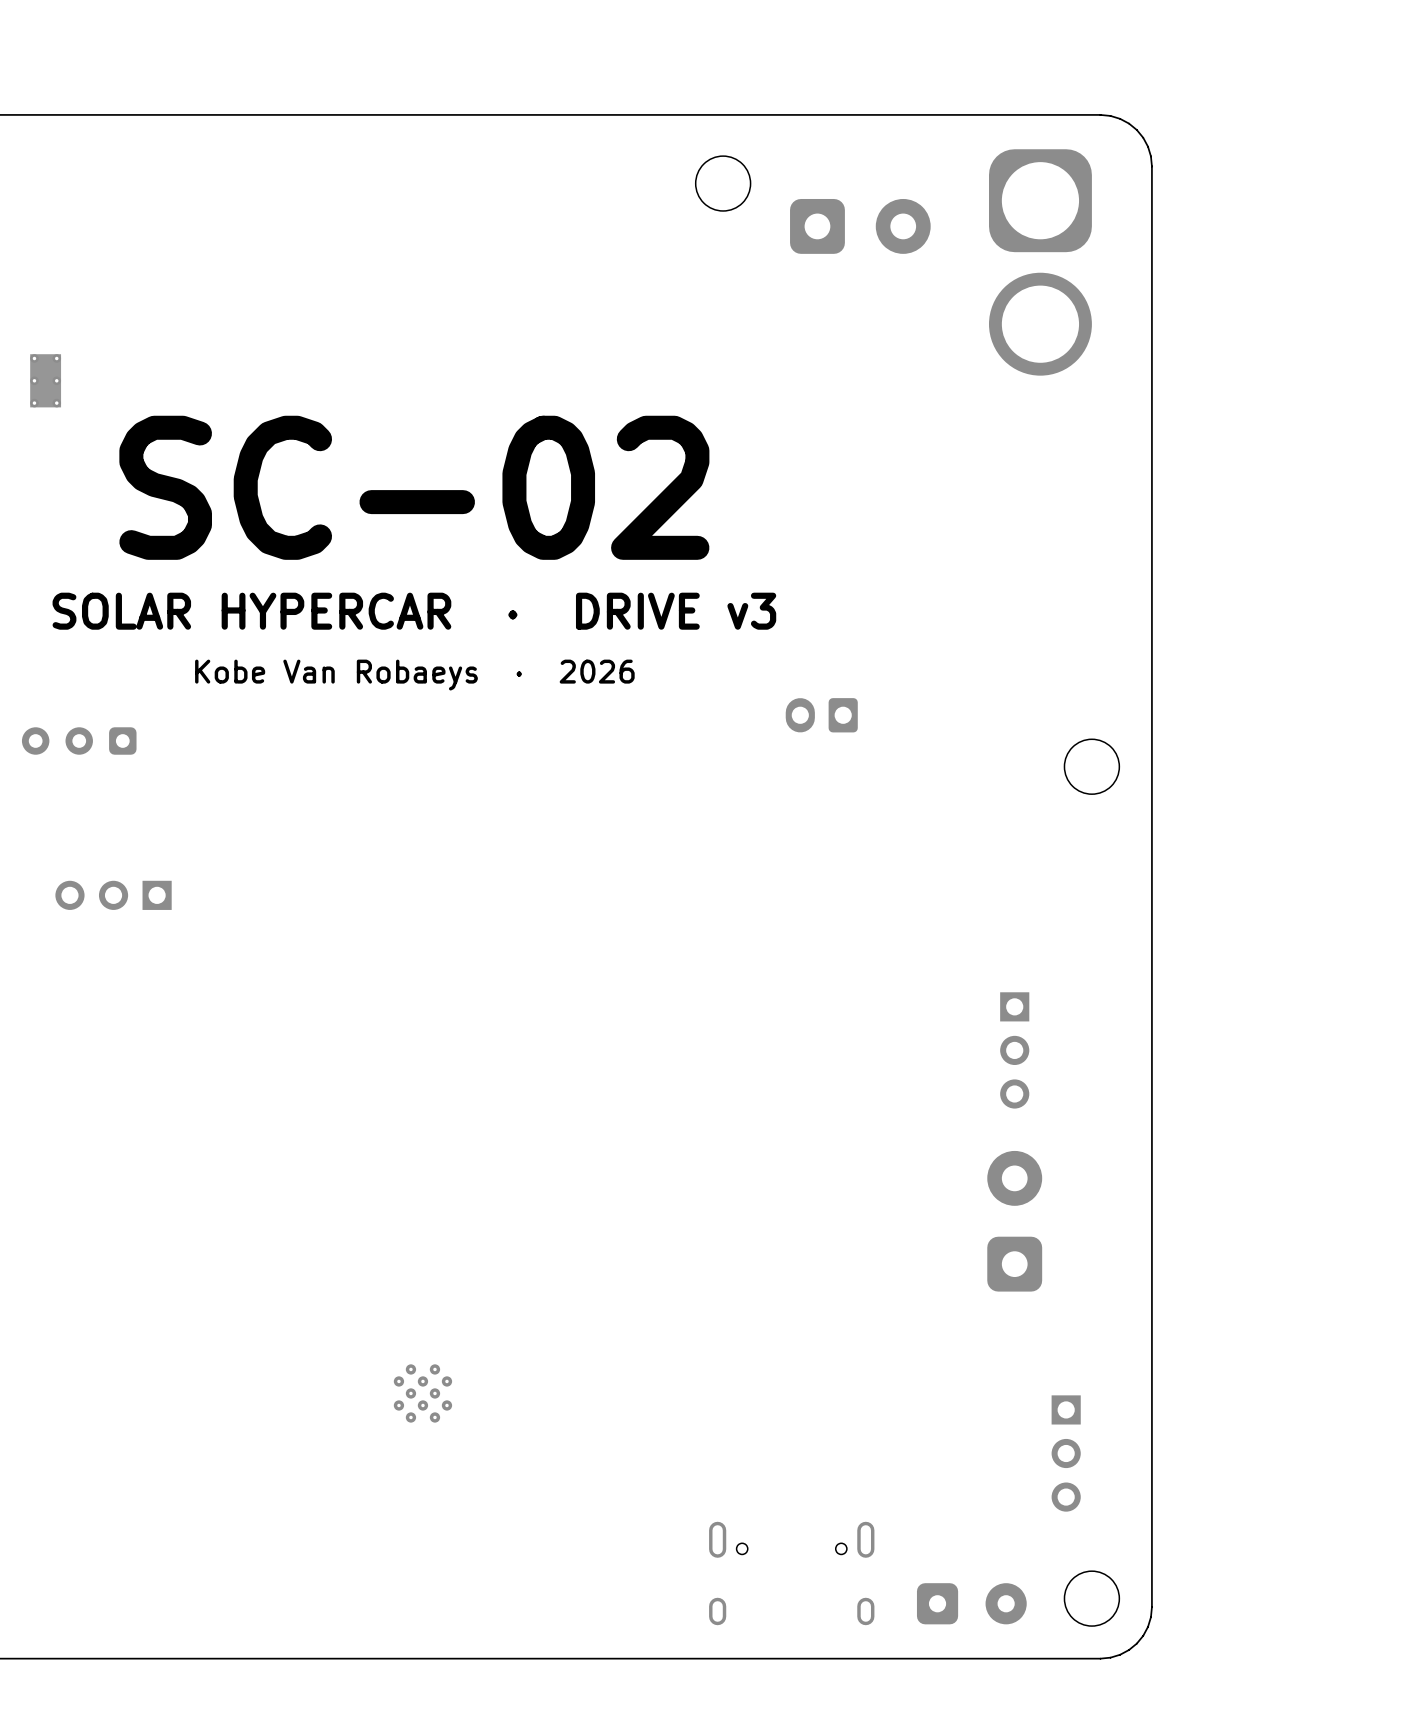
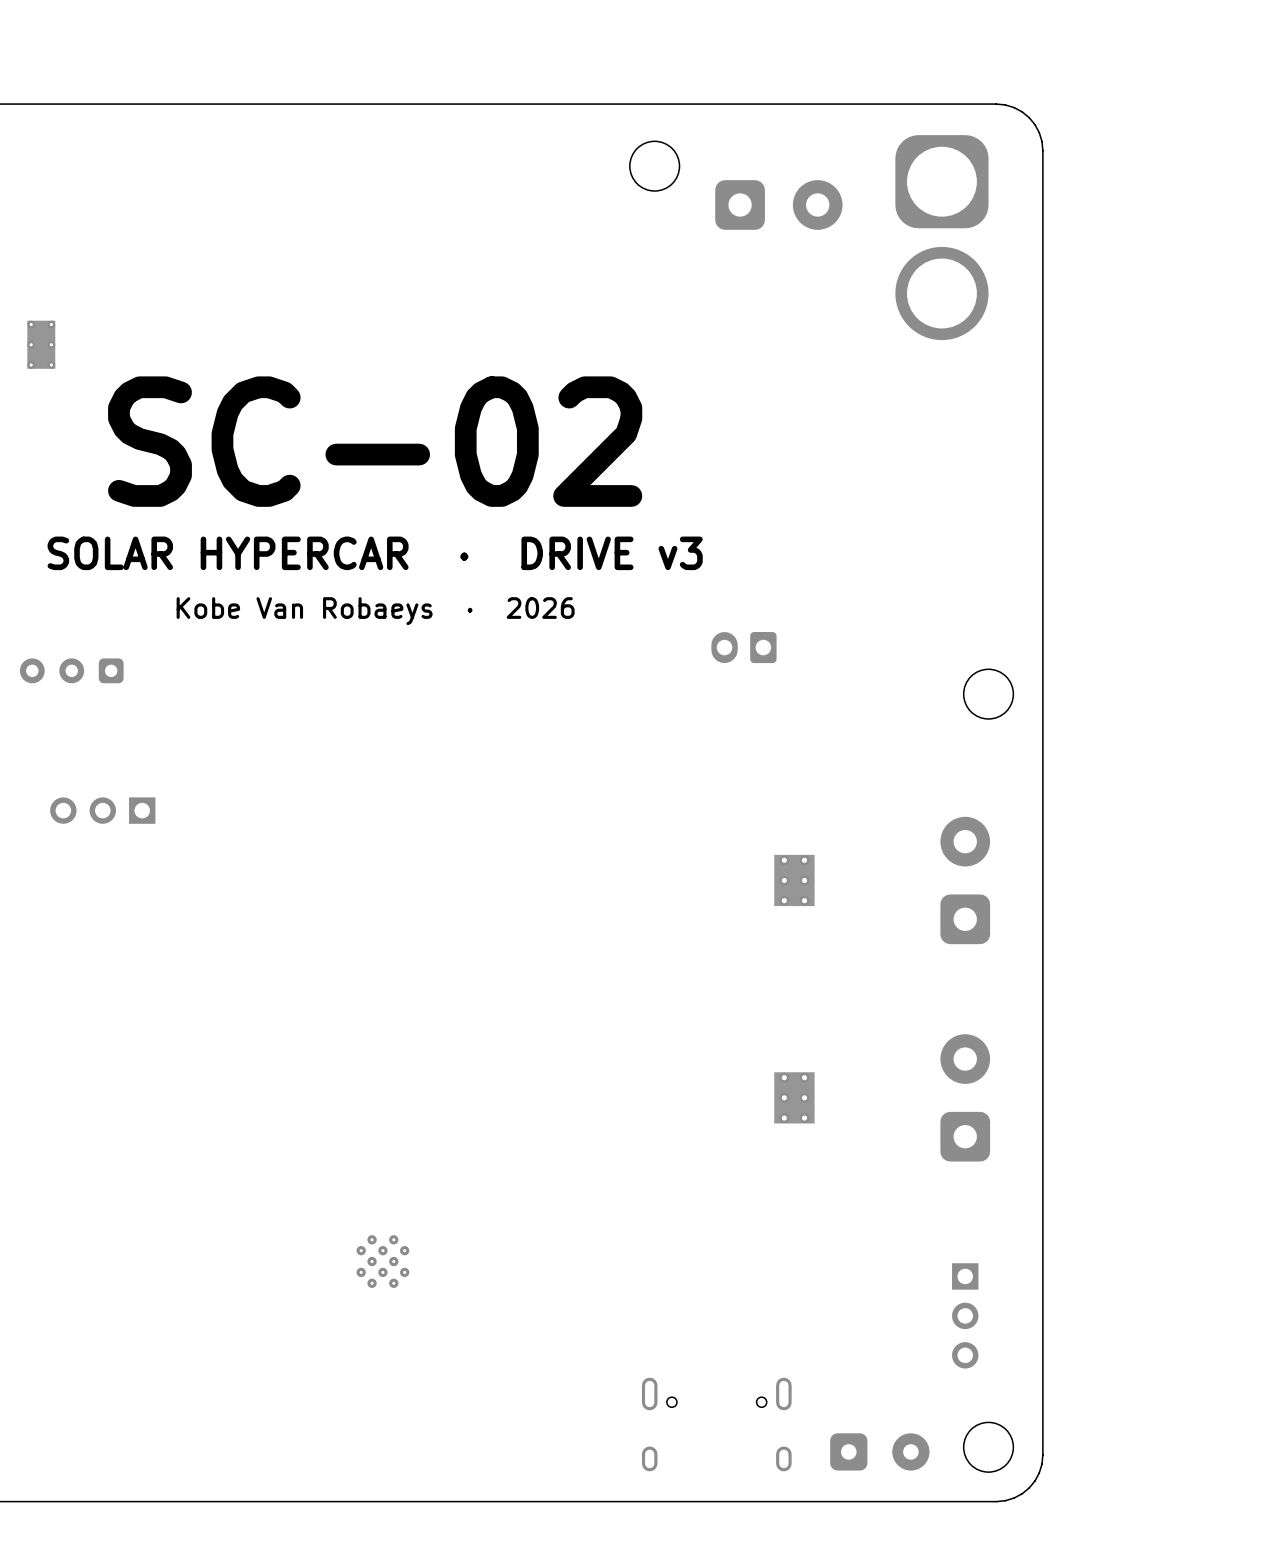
part: none -> (794, 880)
part: none -> (965, 880)
part: (1014, 1050) -> none
part: none -> (794, 1097)
part position: (1014, 1221) -> (965, 1097)

